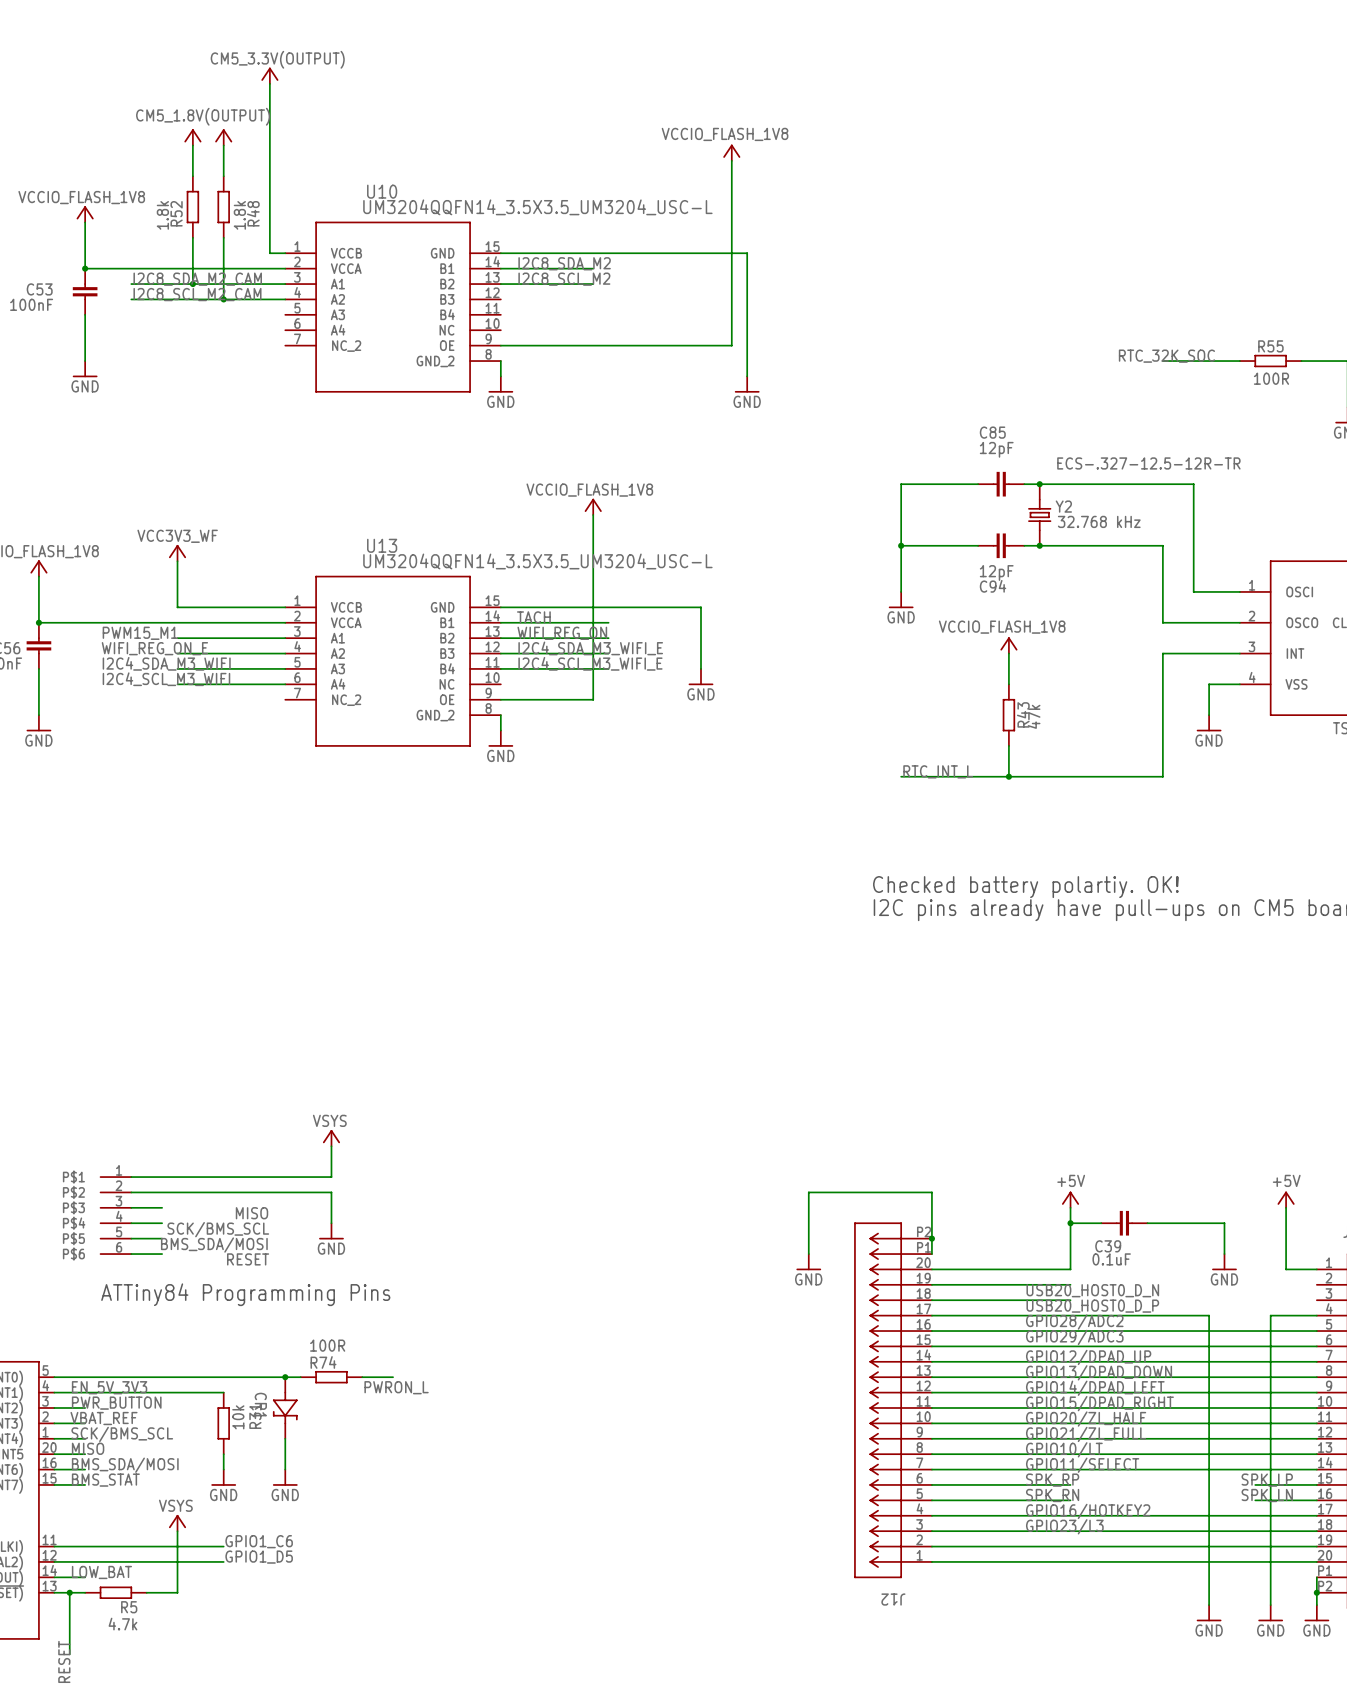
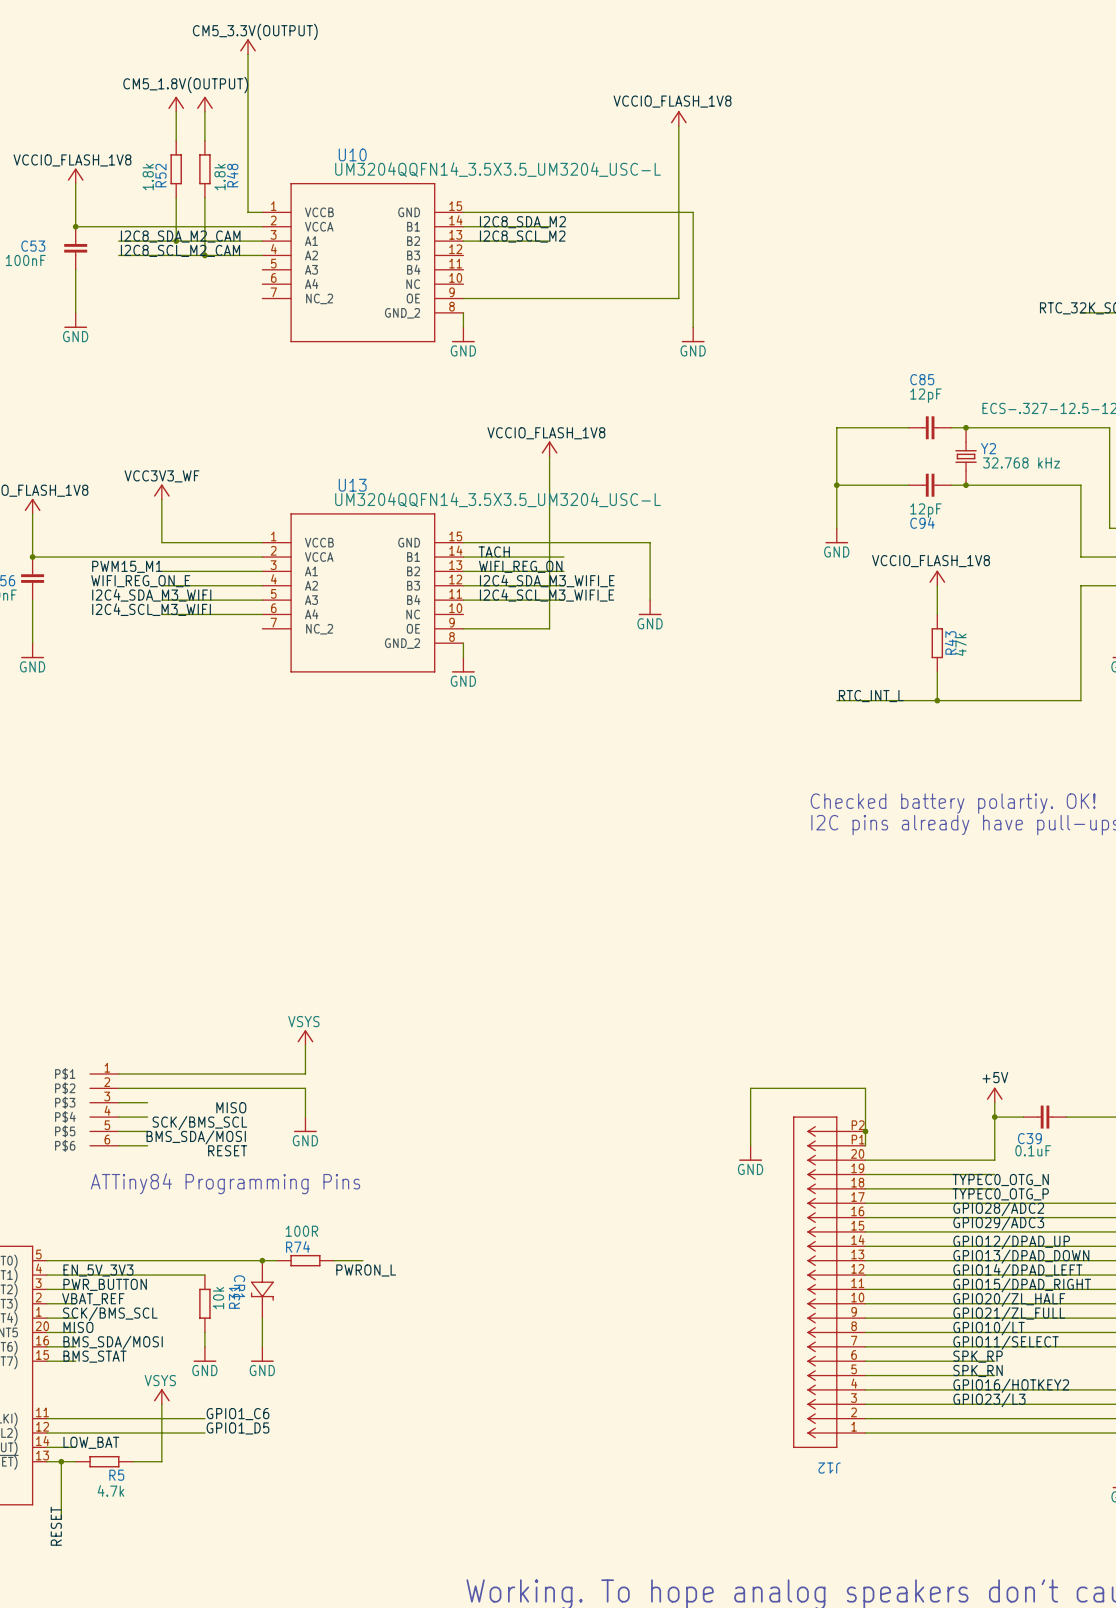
label: USB20_HOST0_D_N (1092, 1290) -> TYPEC0_OTG_N (1000, 1180)
label: USB20_HOST0_D_P (1092, 1306) -> TYPEC0_OTG_P (1000, 1194)

